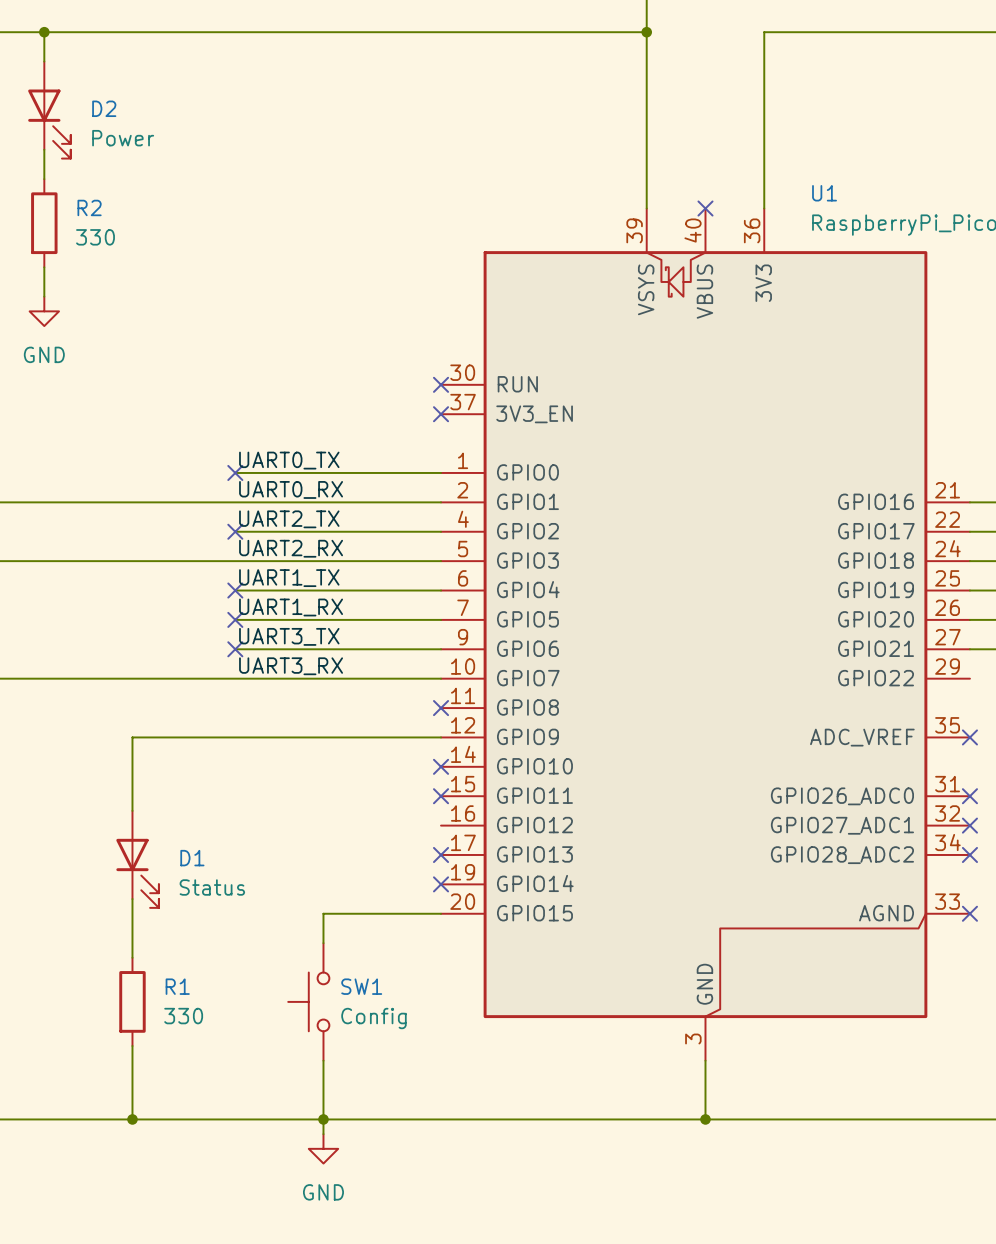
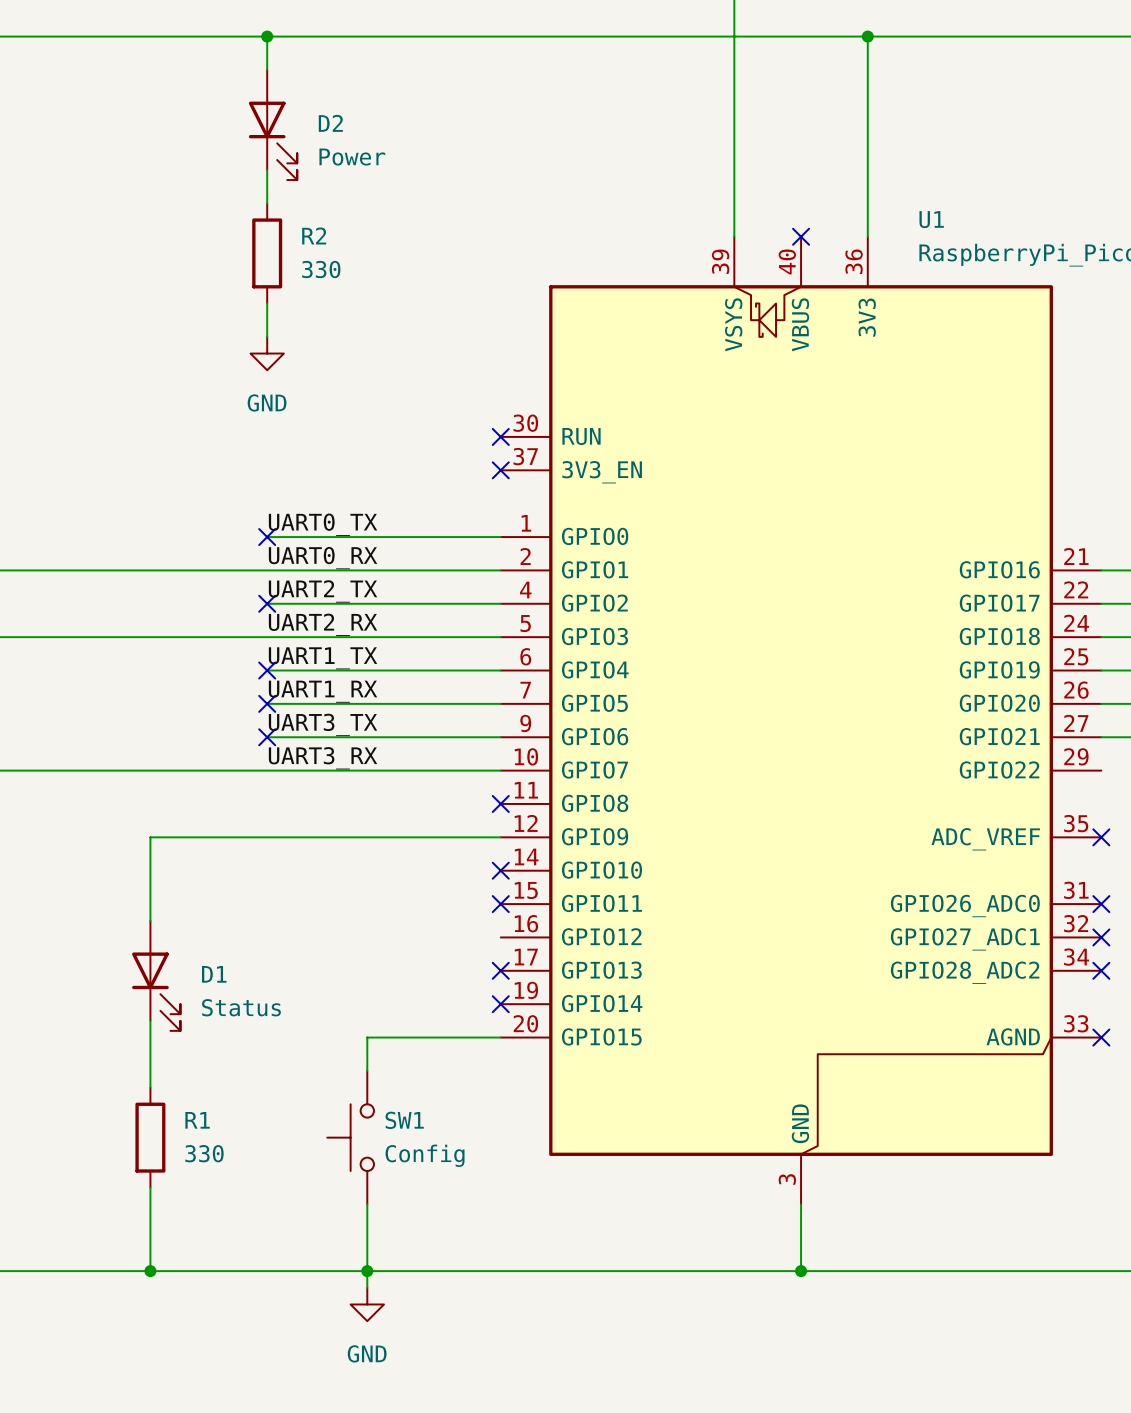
wire: (44, 32) (44, 61) -> (267, 36) (267, 69)
junction: (44, 32) -> none
junction: none -> (267, 36)
wire: none -> (734, 36) (867, 36)
junction: (646, 32) -> none
junction: none -> (867, 36)
D2 position: (49, 110) -> (273, 124)
wire: (44, 149) (44, 179) -> (267, 170) (267, 203)
R2 position: (44, 223) -> (267, 253)
wire: (44, 267) (44, 296) -> (267, 303) (267, 336)
power symbol position: GND (44, 311) -> GND (267, 353)

